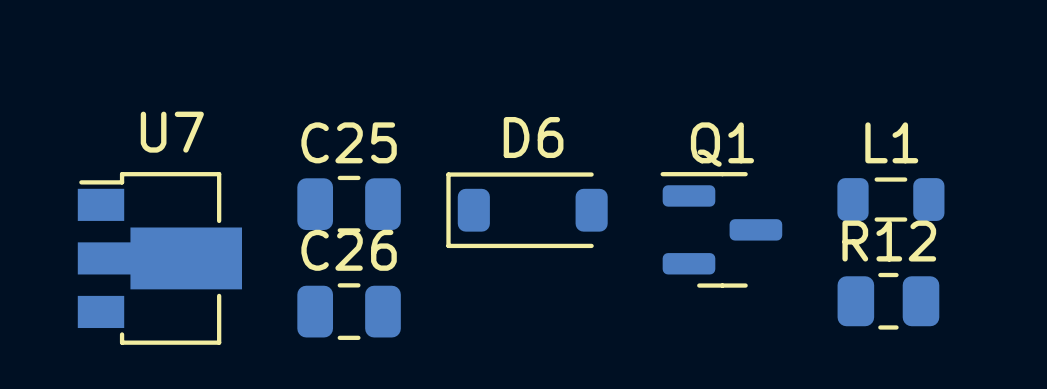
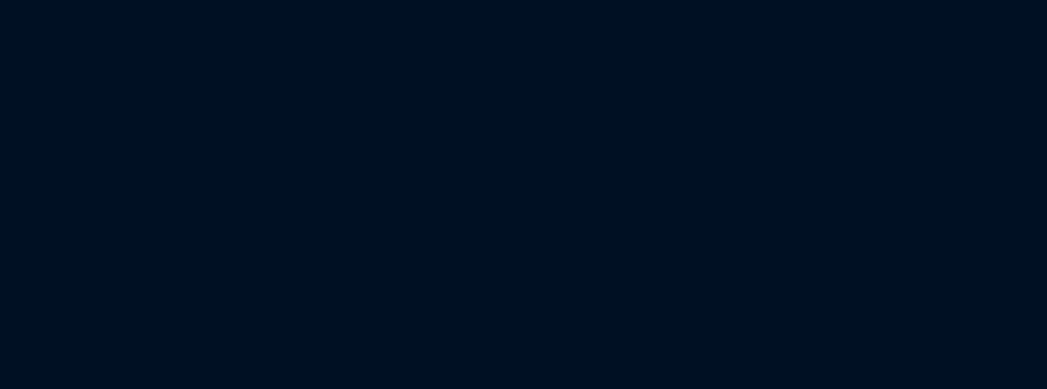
L1: (890, 199) -> none
C25: (349, 204) -> none
D6: (527, 210) -> none
Q1: (721, 229) -> none
U7: (159, 258) -> none
R12: (888, 301) -> none
C26: (349, 311) -> none

